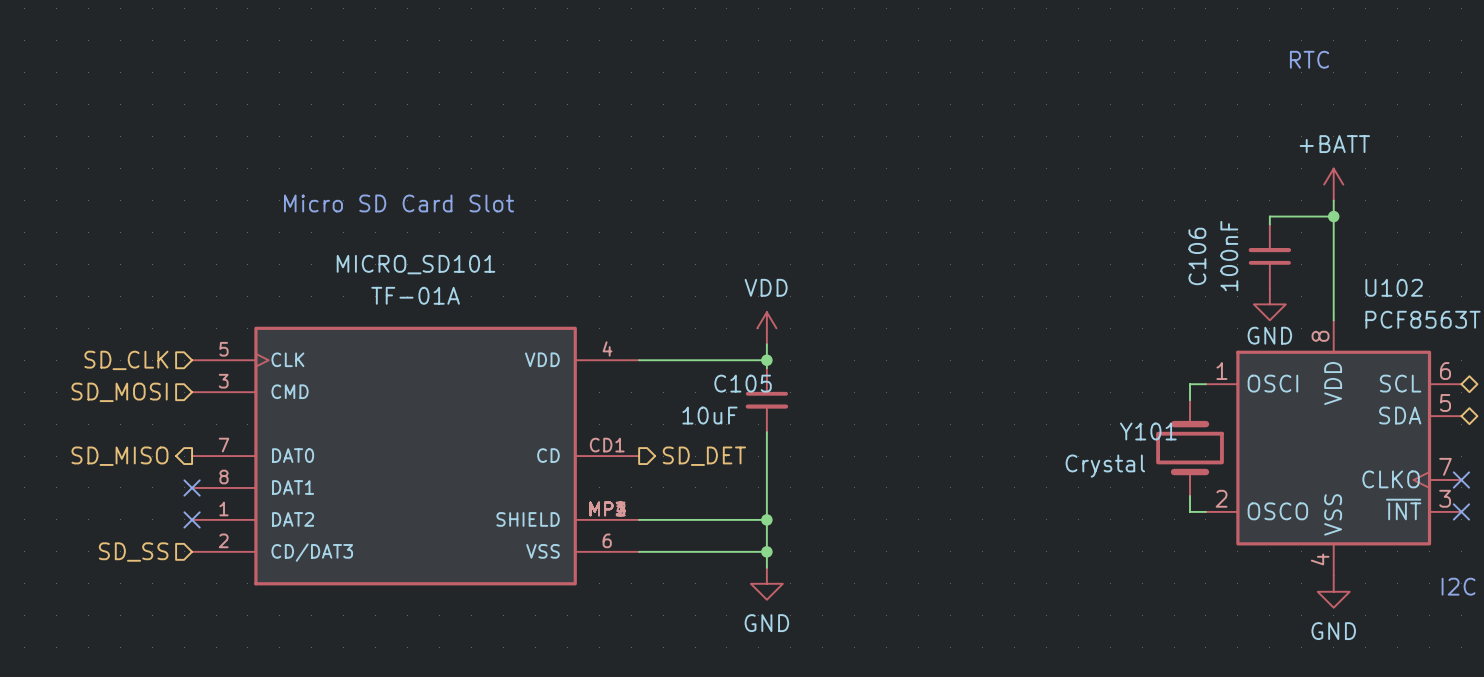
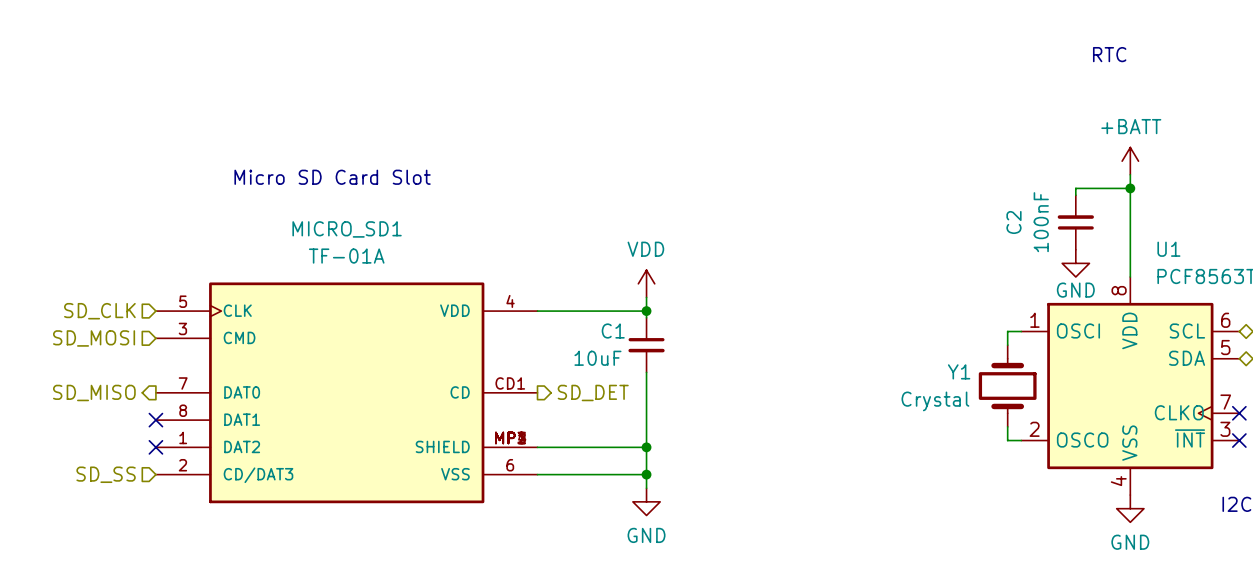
C106 name: C106 (1197, 256) -> C2 (1013, 222)
MICRO_SD101 name: MICRO_SD101 (415, 264) -> MICRO_SD1 (347, 229)
U102 name: U102 (1394, 287) -> U1 (1168, 249)
C105 name: C105 (743, 383) -> C1 (613, 331)
Y101 name: Y101 (1148, 431) -> Y1 (959, 371)

